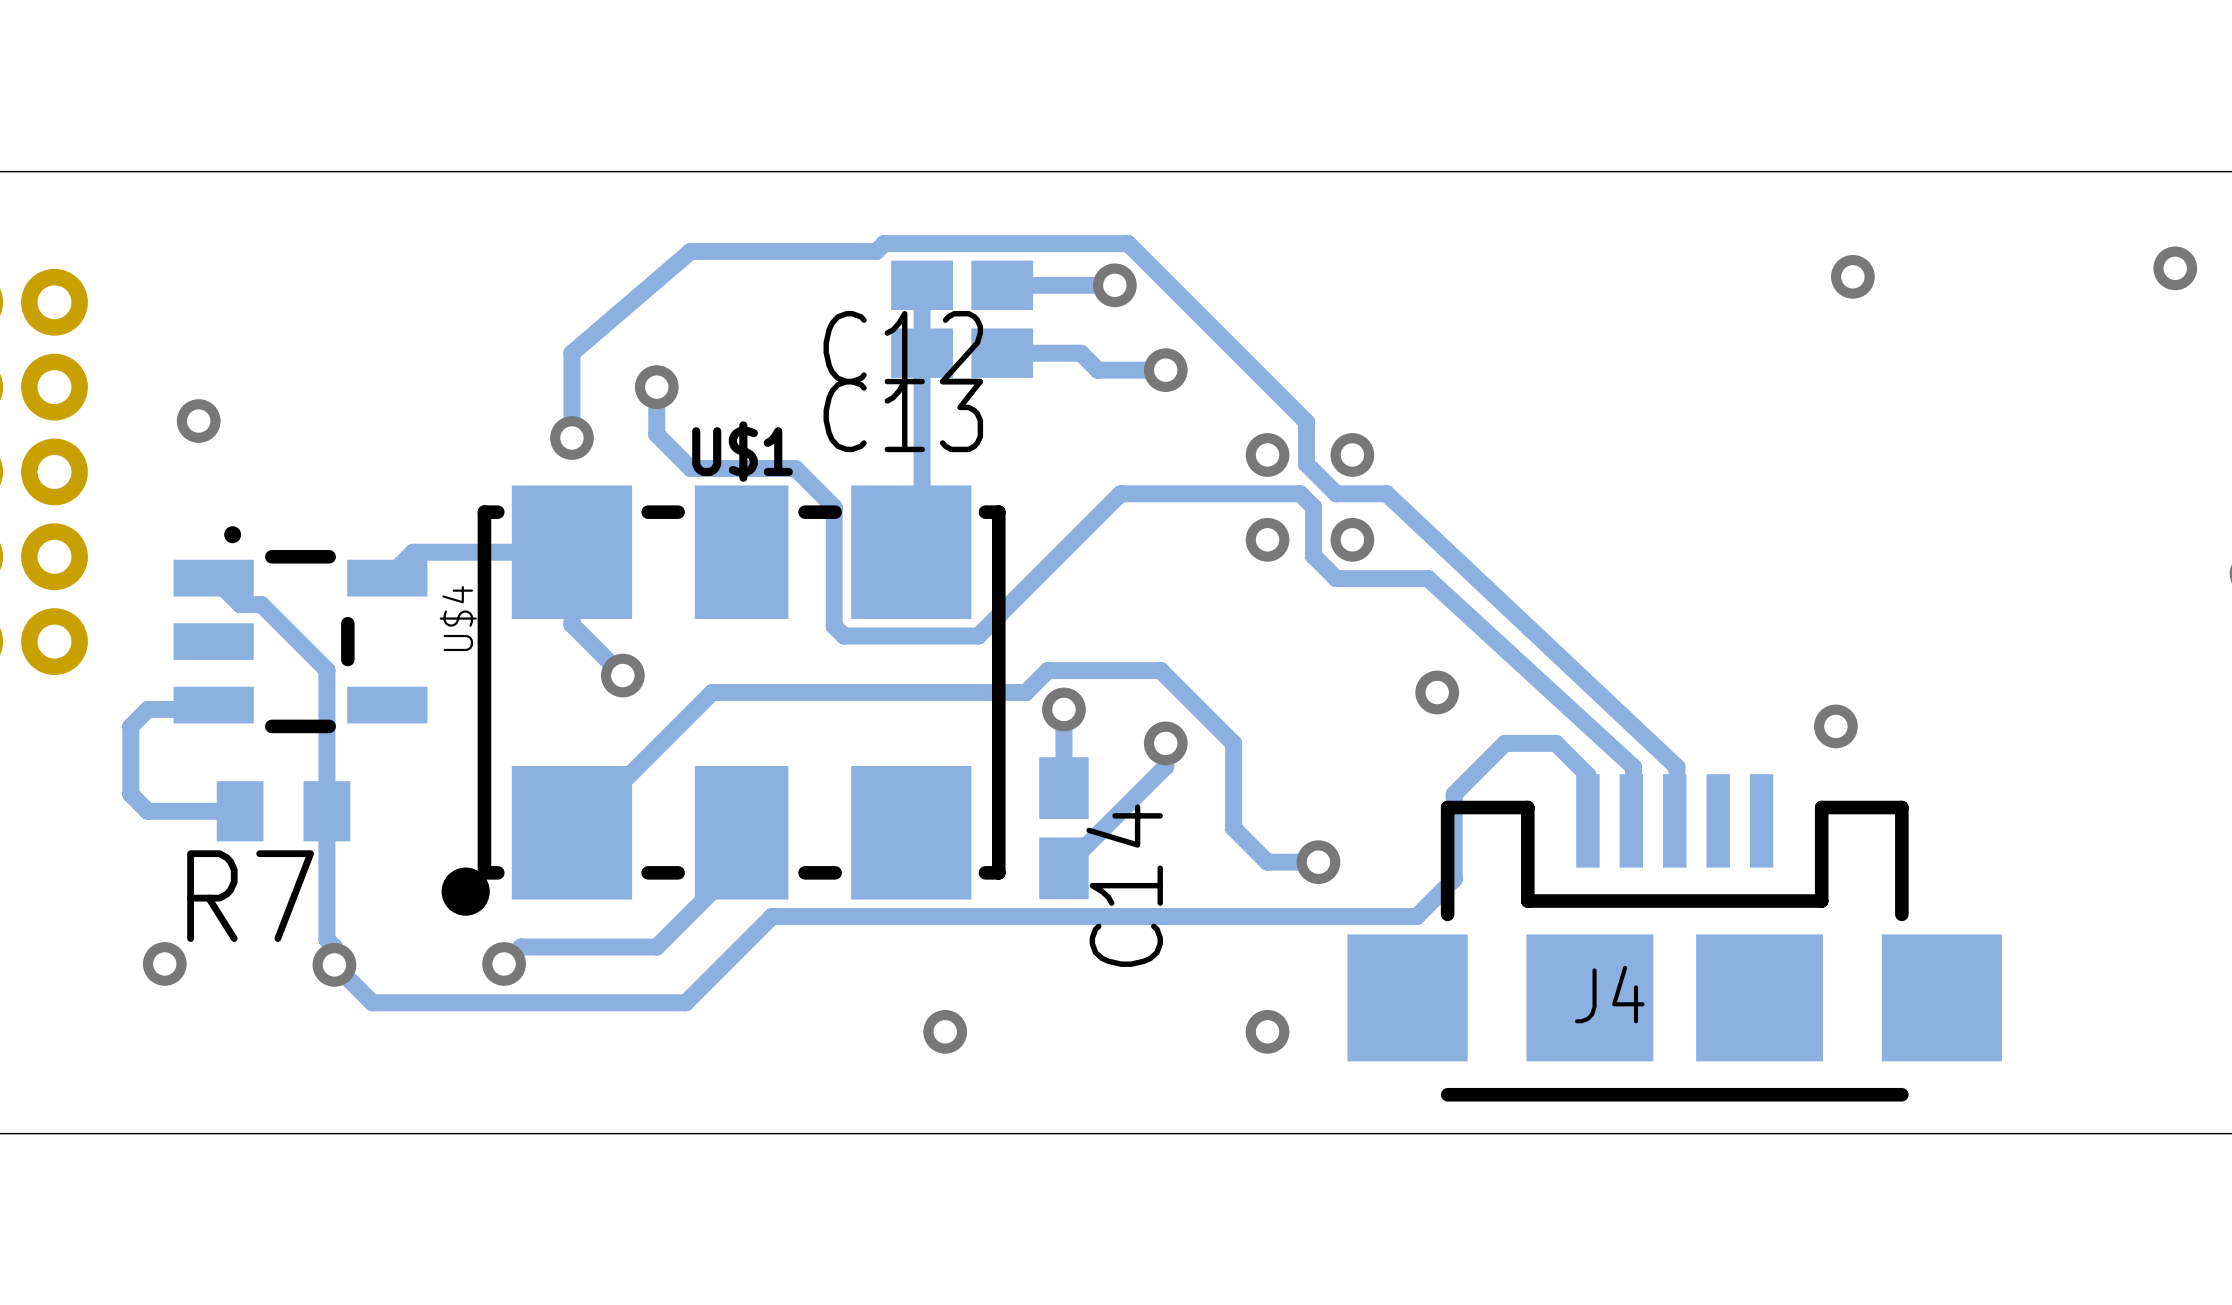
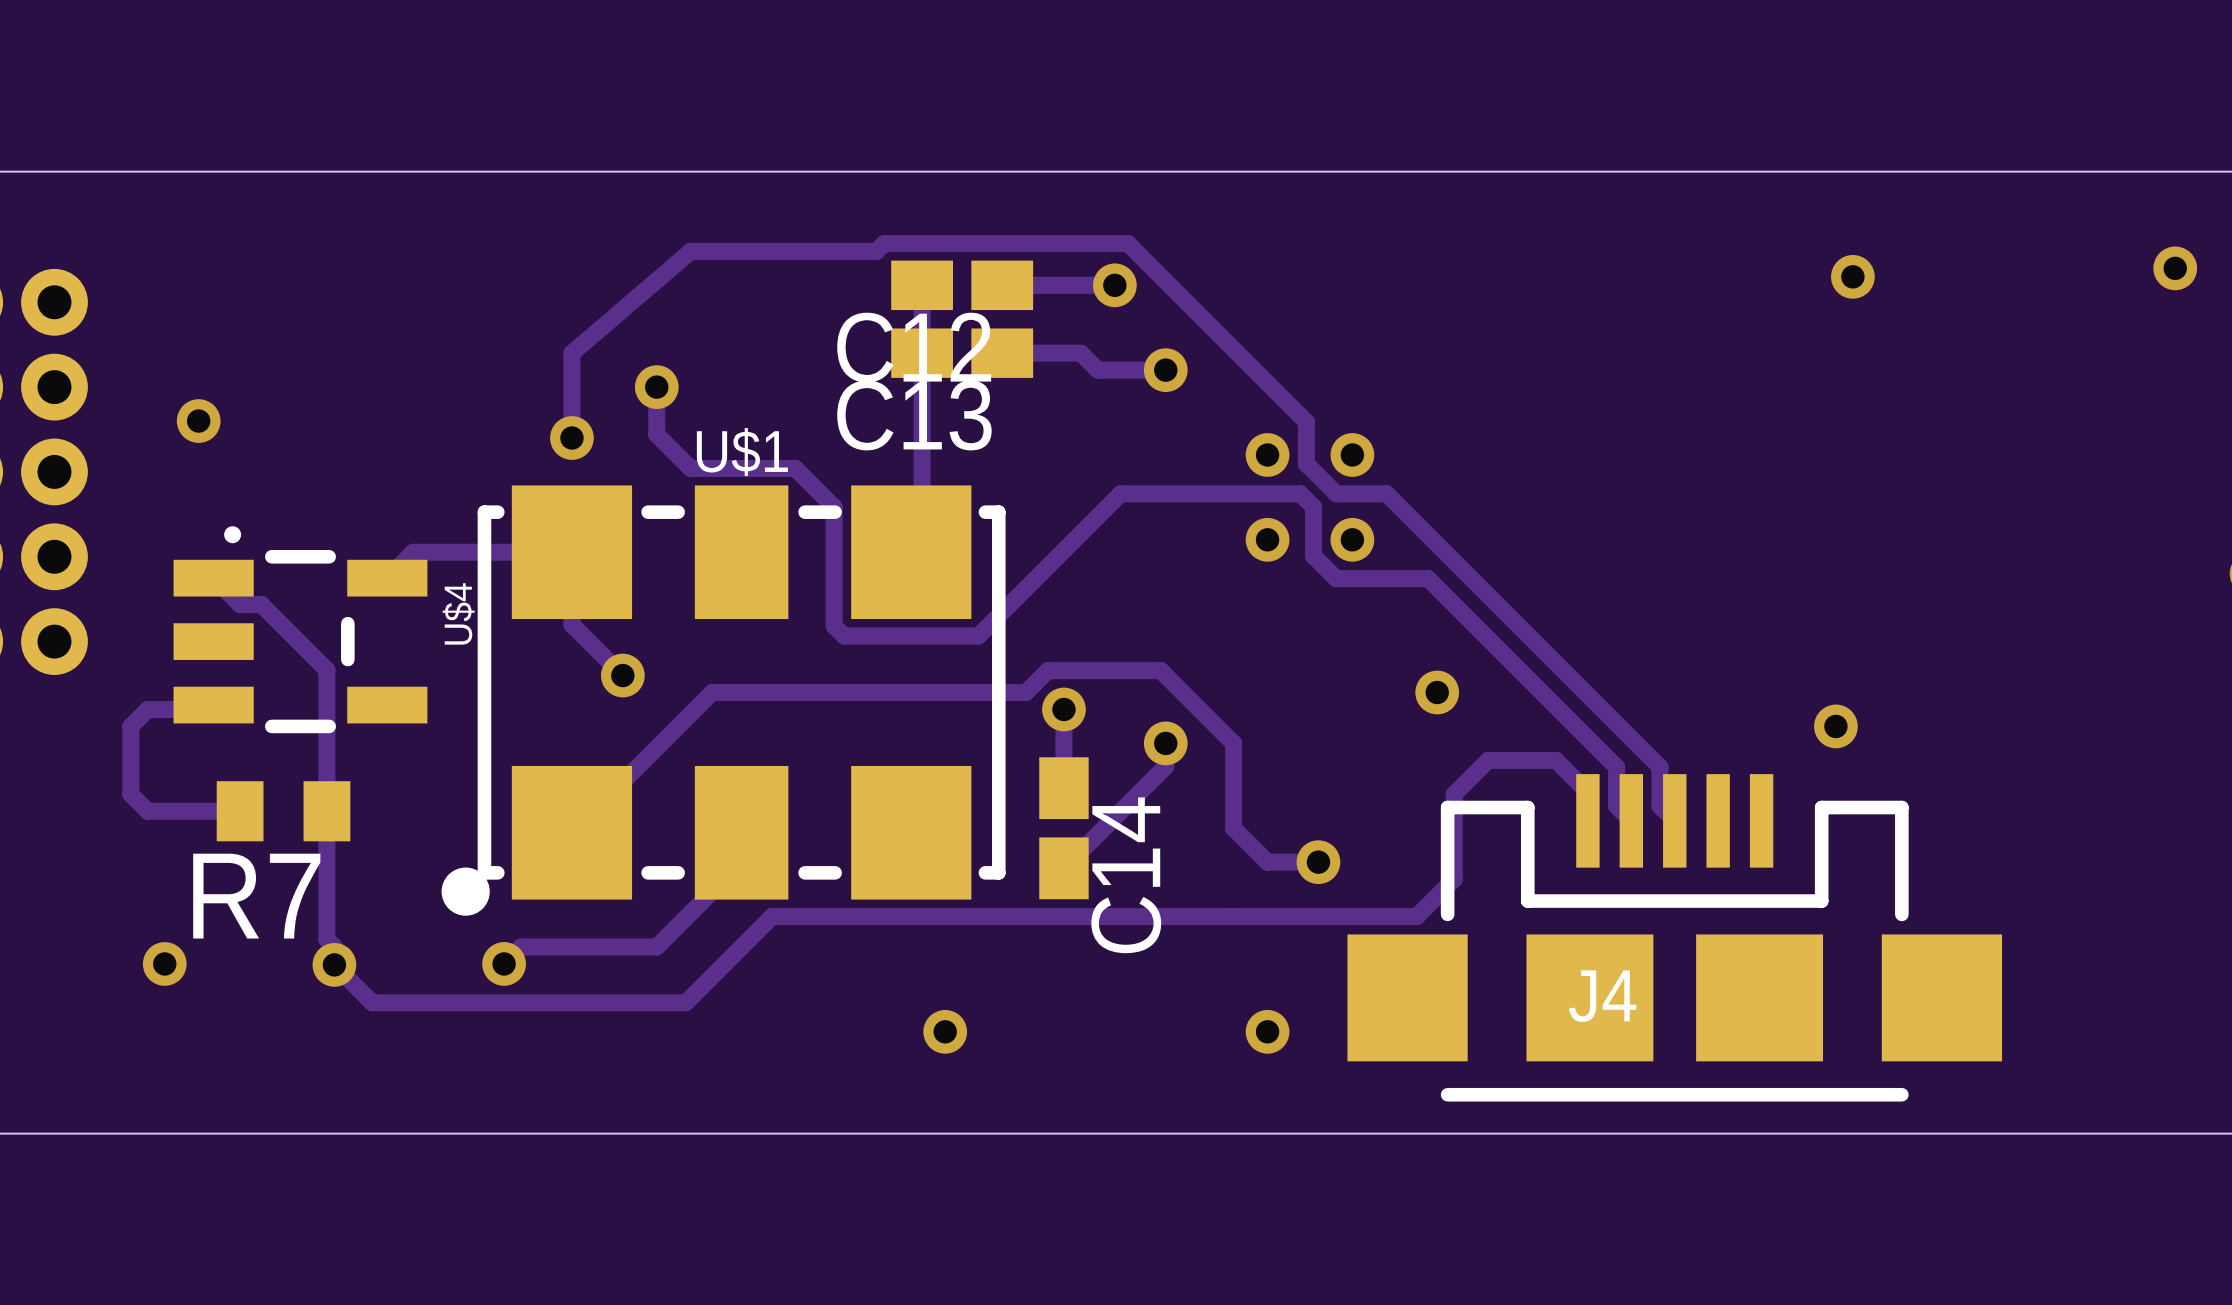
track: (1386, 493) (1676, 767) (1676, 806) (1674, 820) -> (1386, 493) (1659, 767) (1659, 806) (1674, 820)
track: (1428, 578) (1633, 767) (1633, 806) (1631, 820) -> (1428, 578) (1616, 767) (1616, 806) (1631, 820)
track: (1488, 760) (1505, 743) (1555, 743) (1587, 775) (1587, 792) -> (1488, 760) (1555, 760) (1587, 792)

